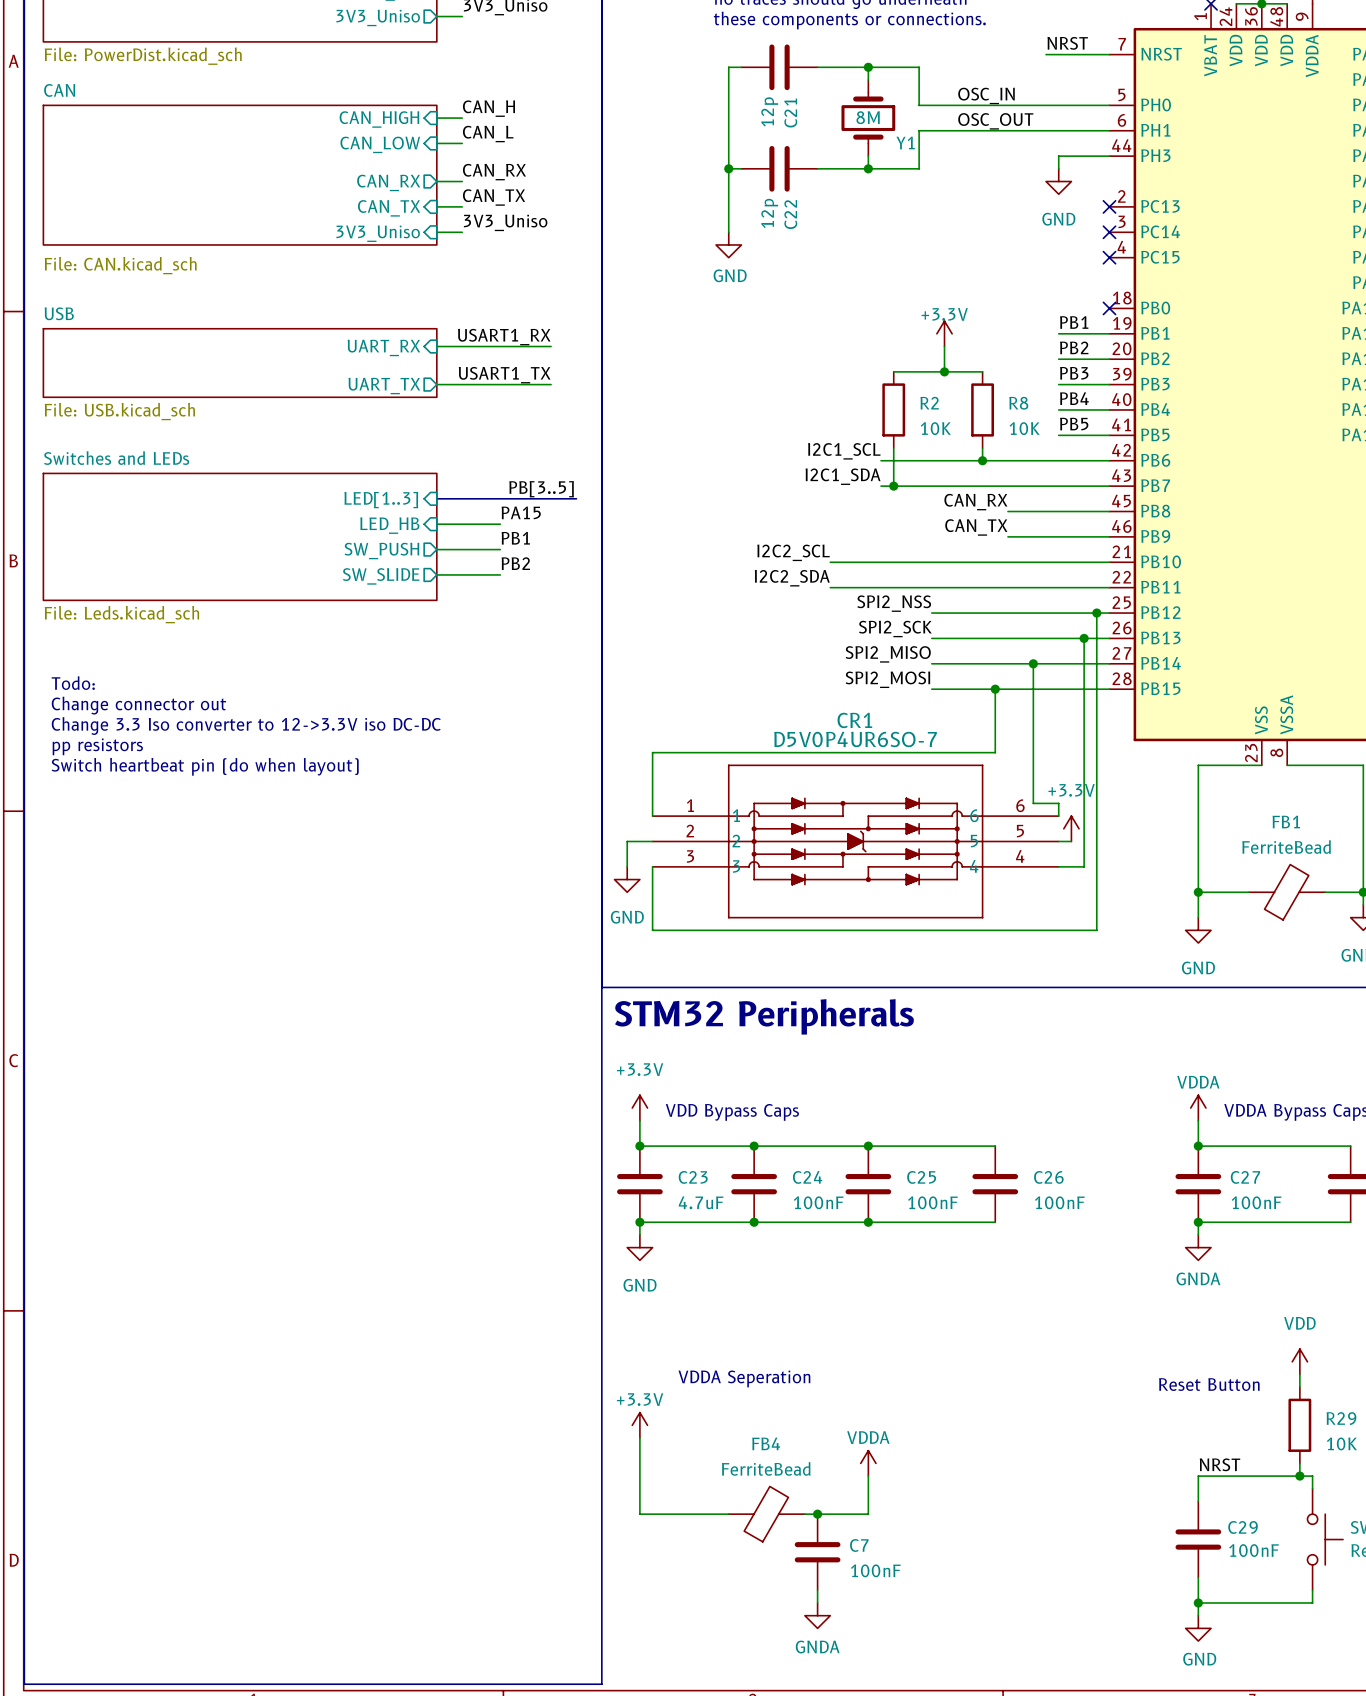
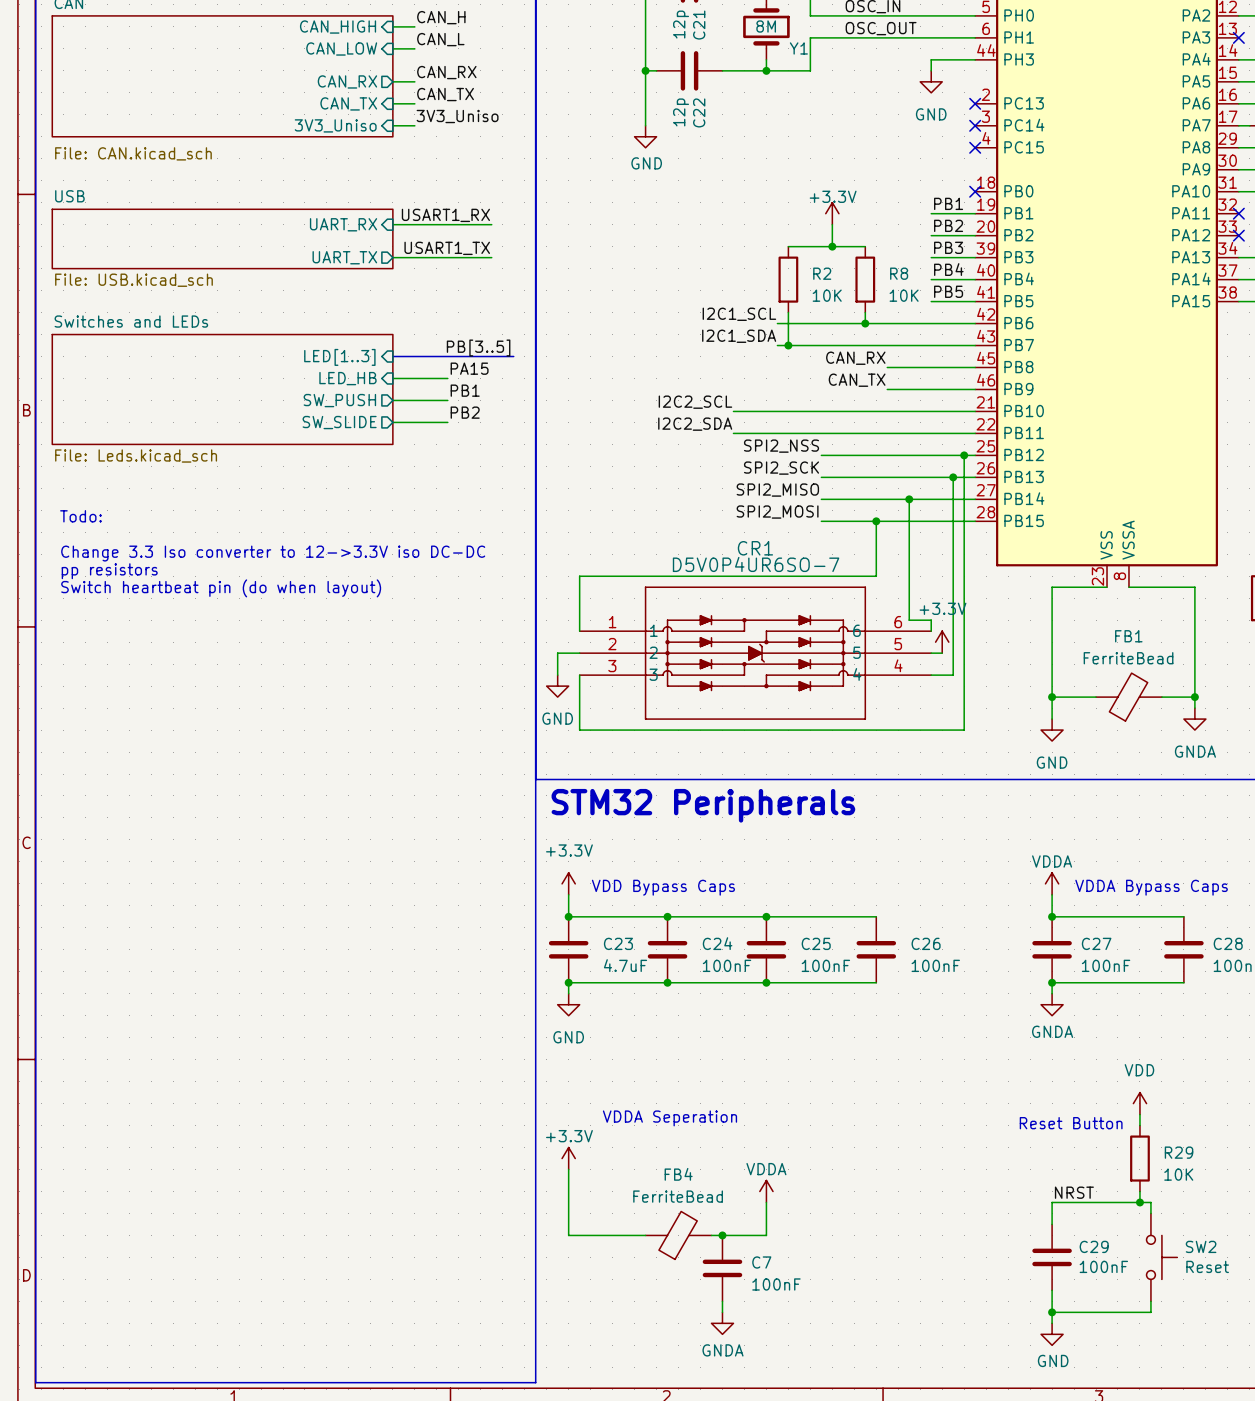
text: Change connector out (138, 705) -> none

